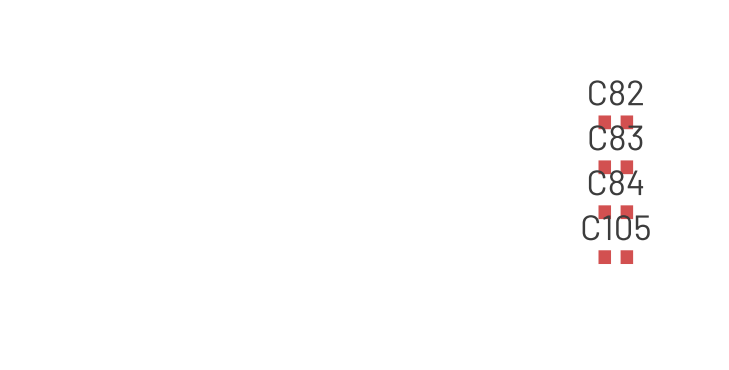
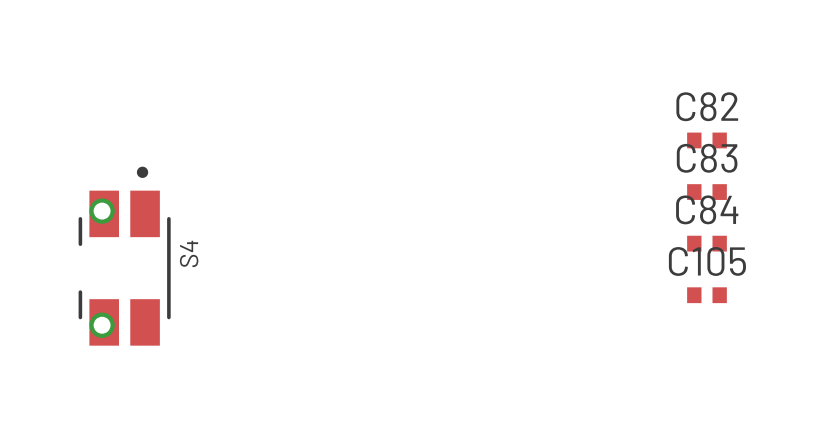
S4: none -> (124, 256)

